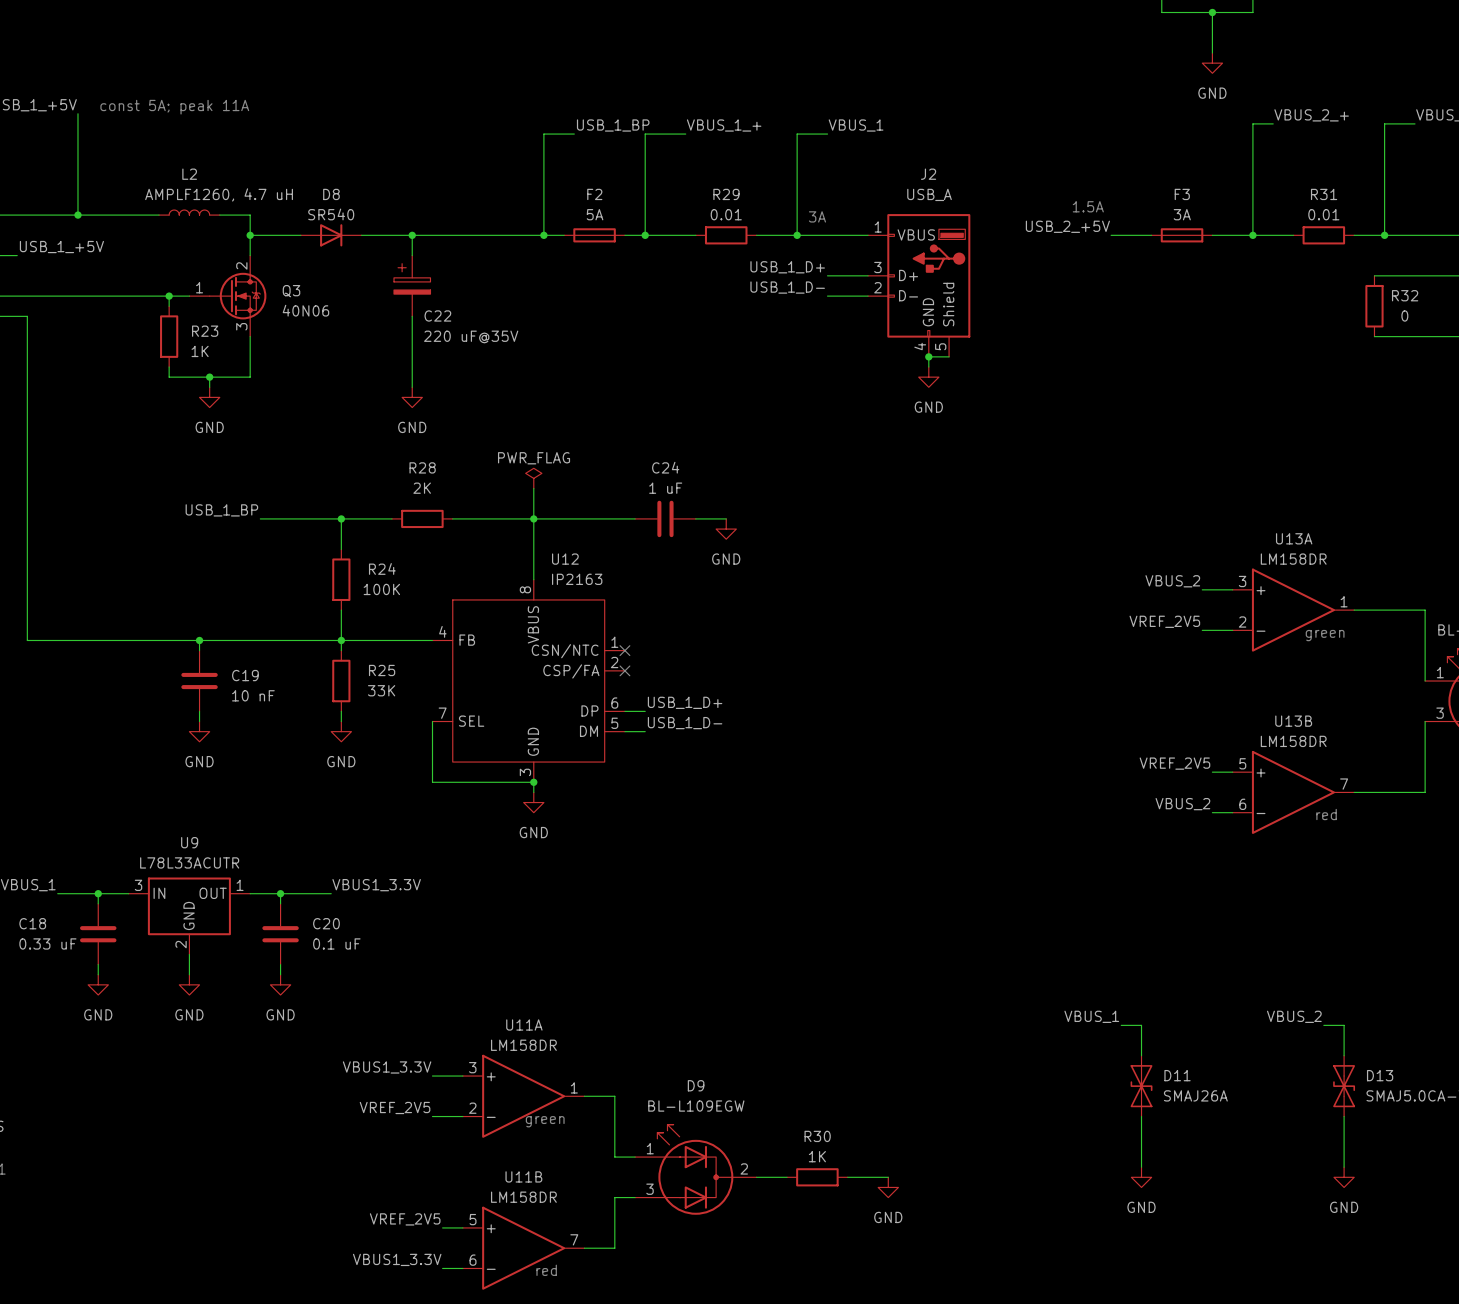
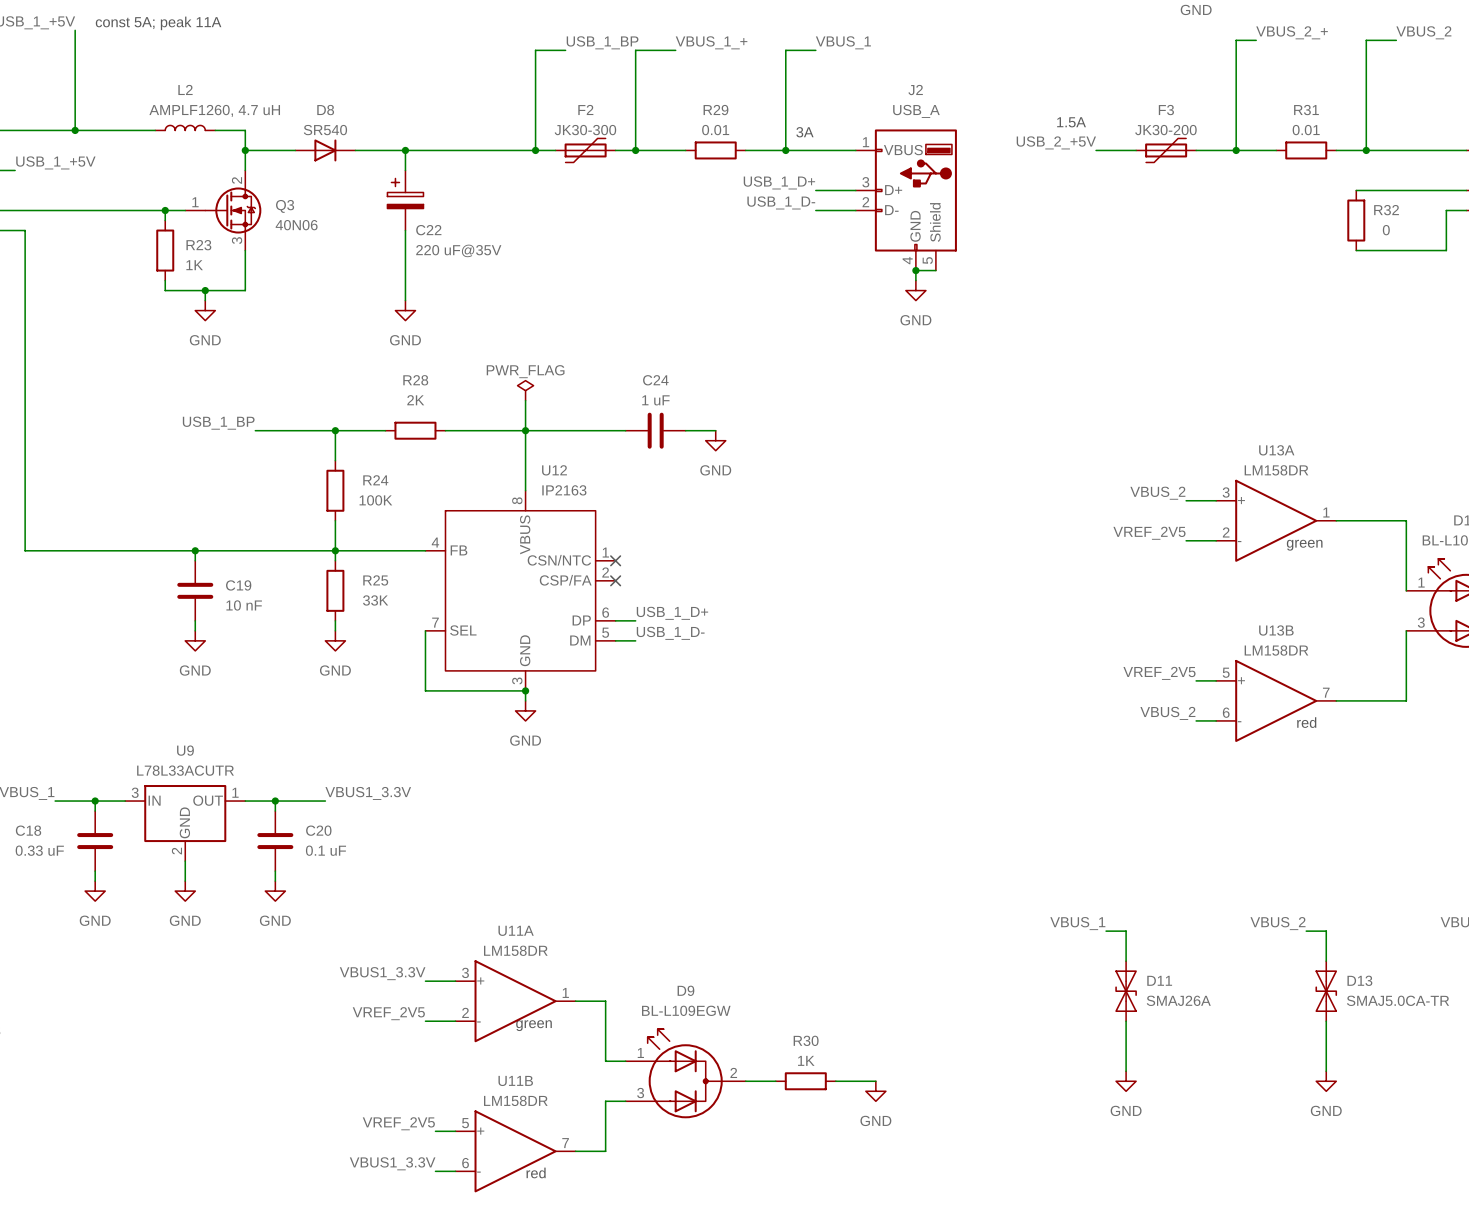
F2 value: 5A (595, 214) -> JK30-300 (585, 130)
F3 value: 3A (1182, 214) -> JK30-200 (1165, 130)
F2 symbol: [564, 228, 625, 243] -> [555, 138, 616, 163]
F3 symbol: [1151, 228, 1213, 243] -> [1136, 138, 1197, 163]

